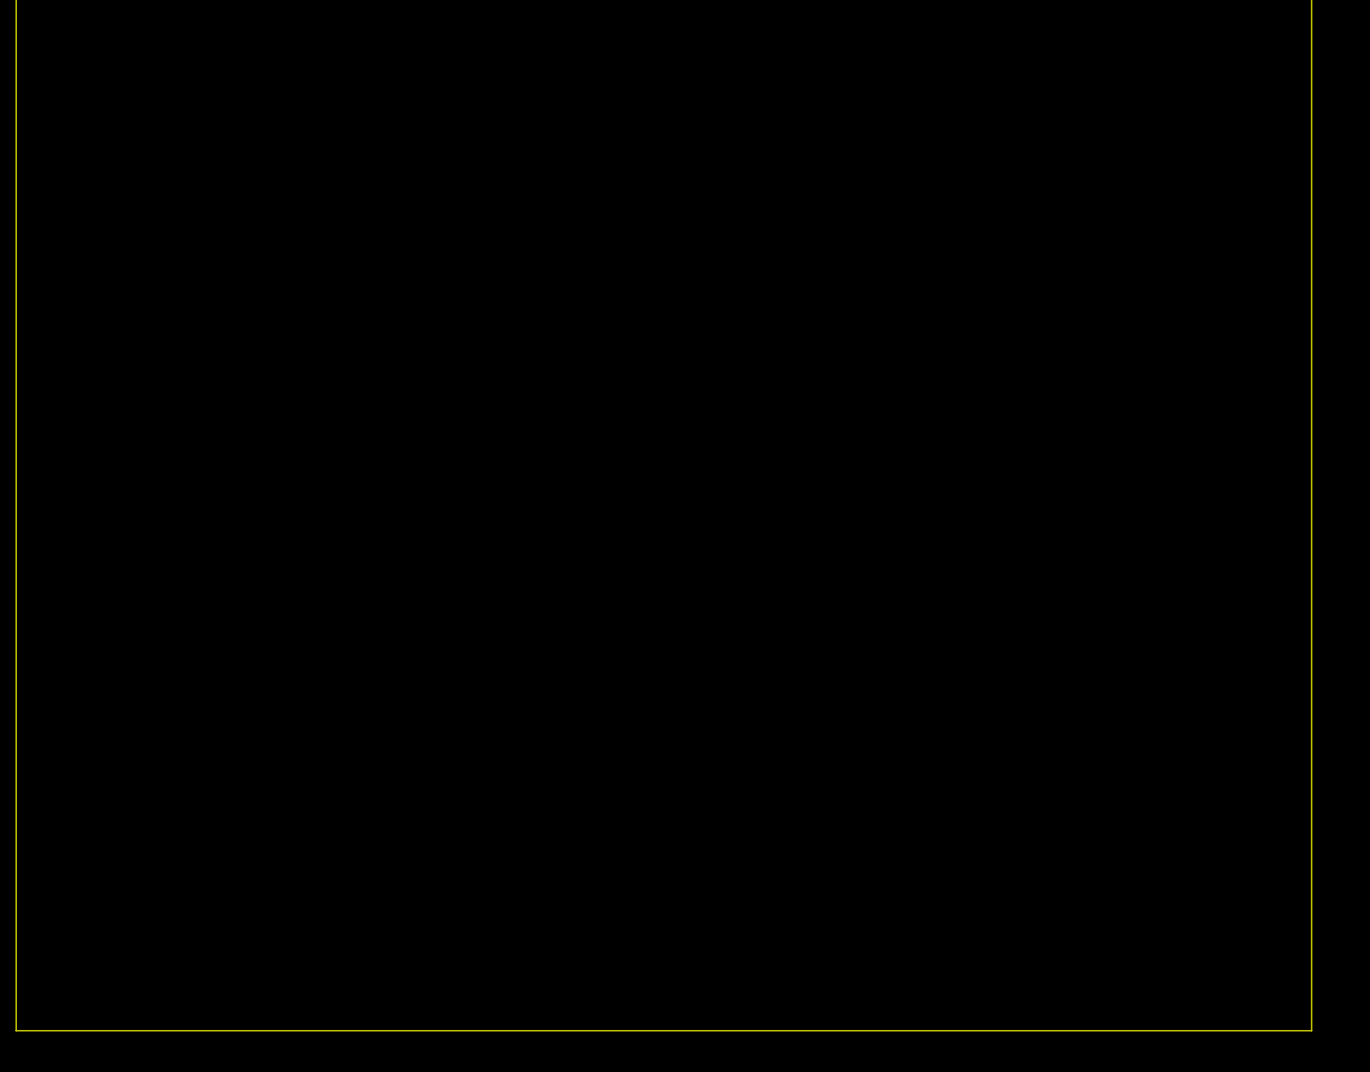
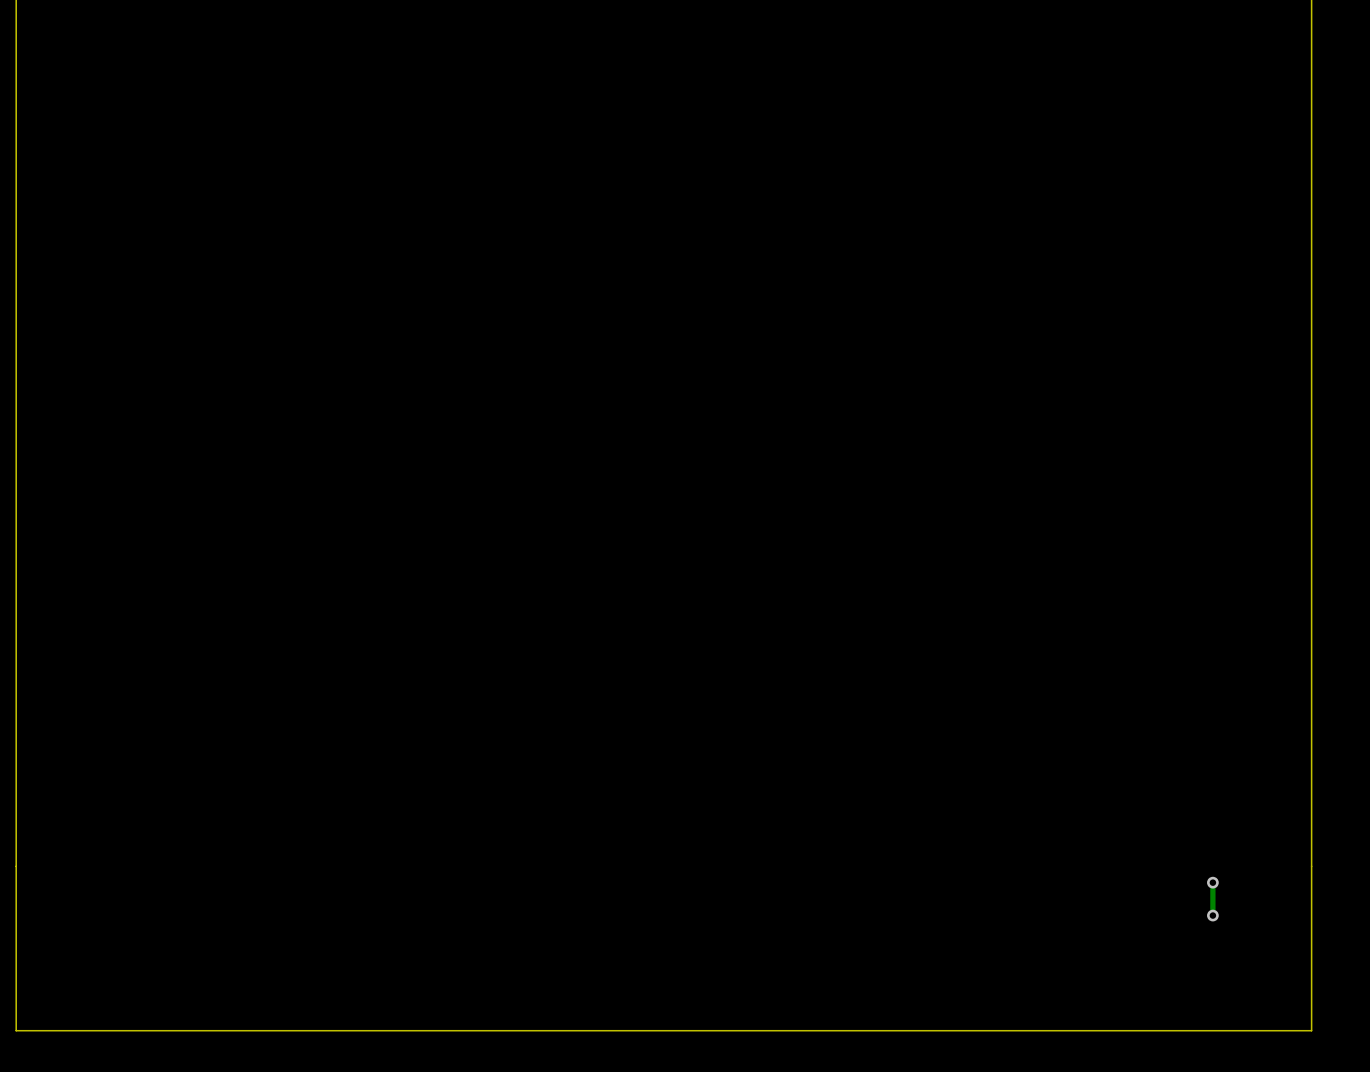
track: none -> (1212, 882) (1212, 915)
via: none -> (1212, 882)
via: none -> (1212, 915)

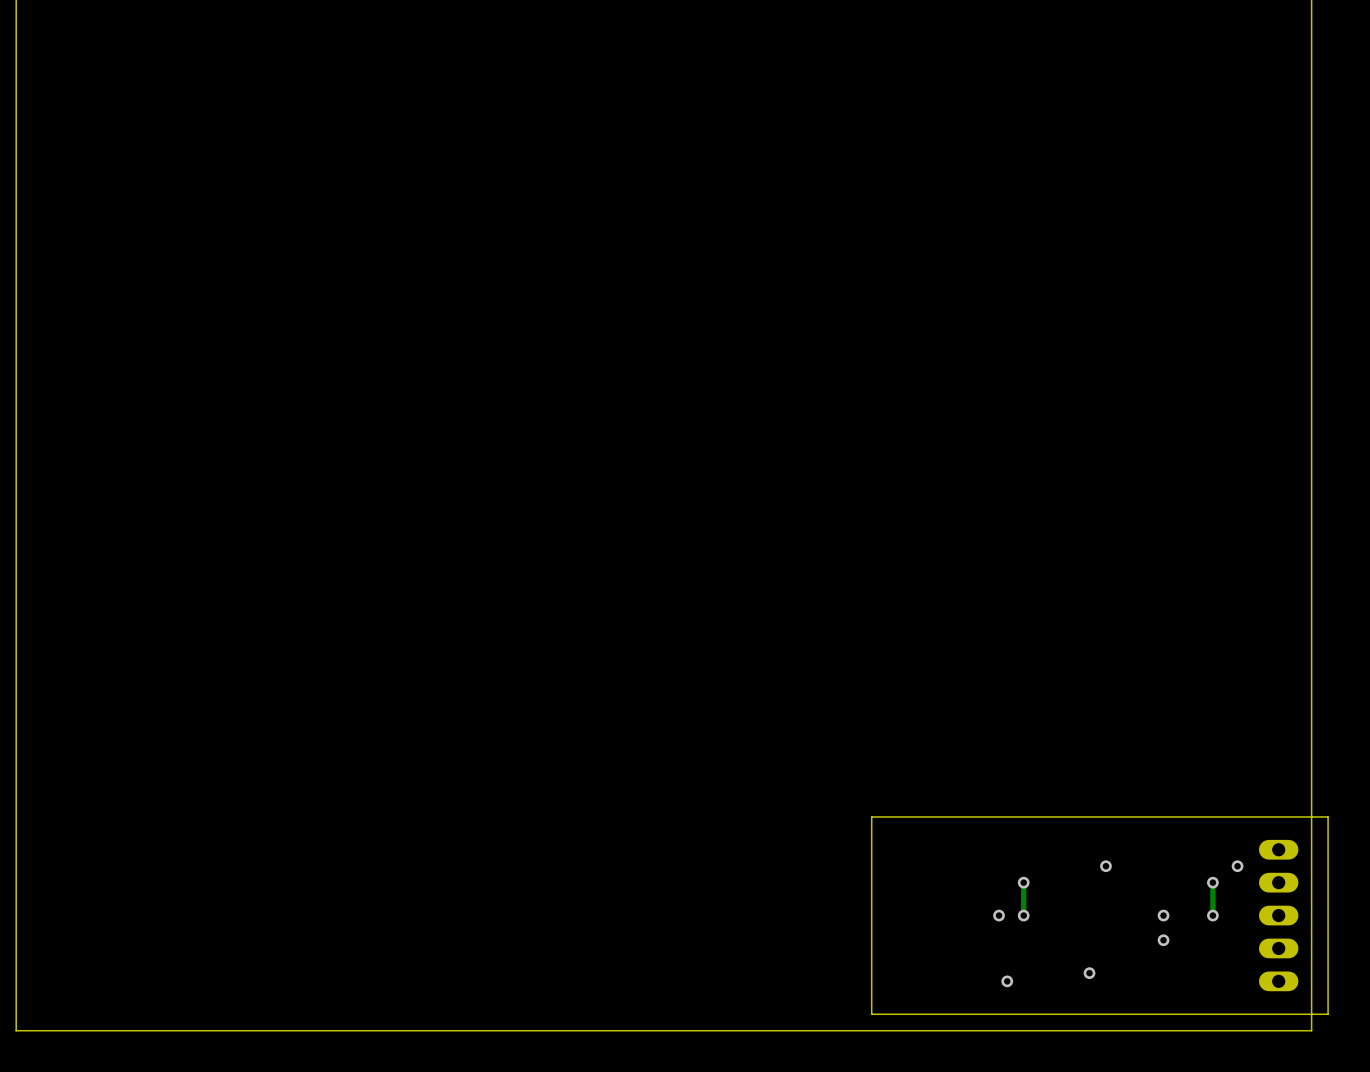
board edge: none -> (1328, 816) (1328, 1014) (871, 1014) (871, 816) (1328, 816)
via: none -> (1105, 866)
via: none -> (1237, 866)
track: none -> (1023, 882) (1023, 915)
via: none -> (1023, 882)
via: none -> (999, 915)
via: none -> (1023, 915)
via: none -> (1163, 915)
part: none -> (1278, 915)
via: none -> (1163, 940)
via: none -> (1089, 973)
via: none -> (1007, 981)

